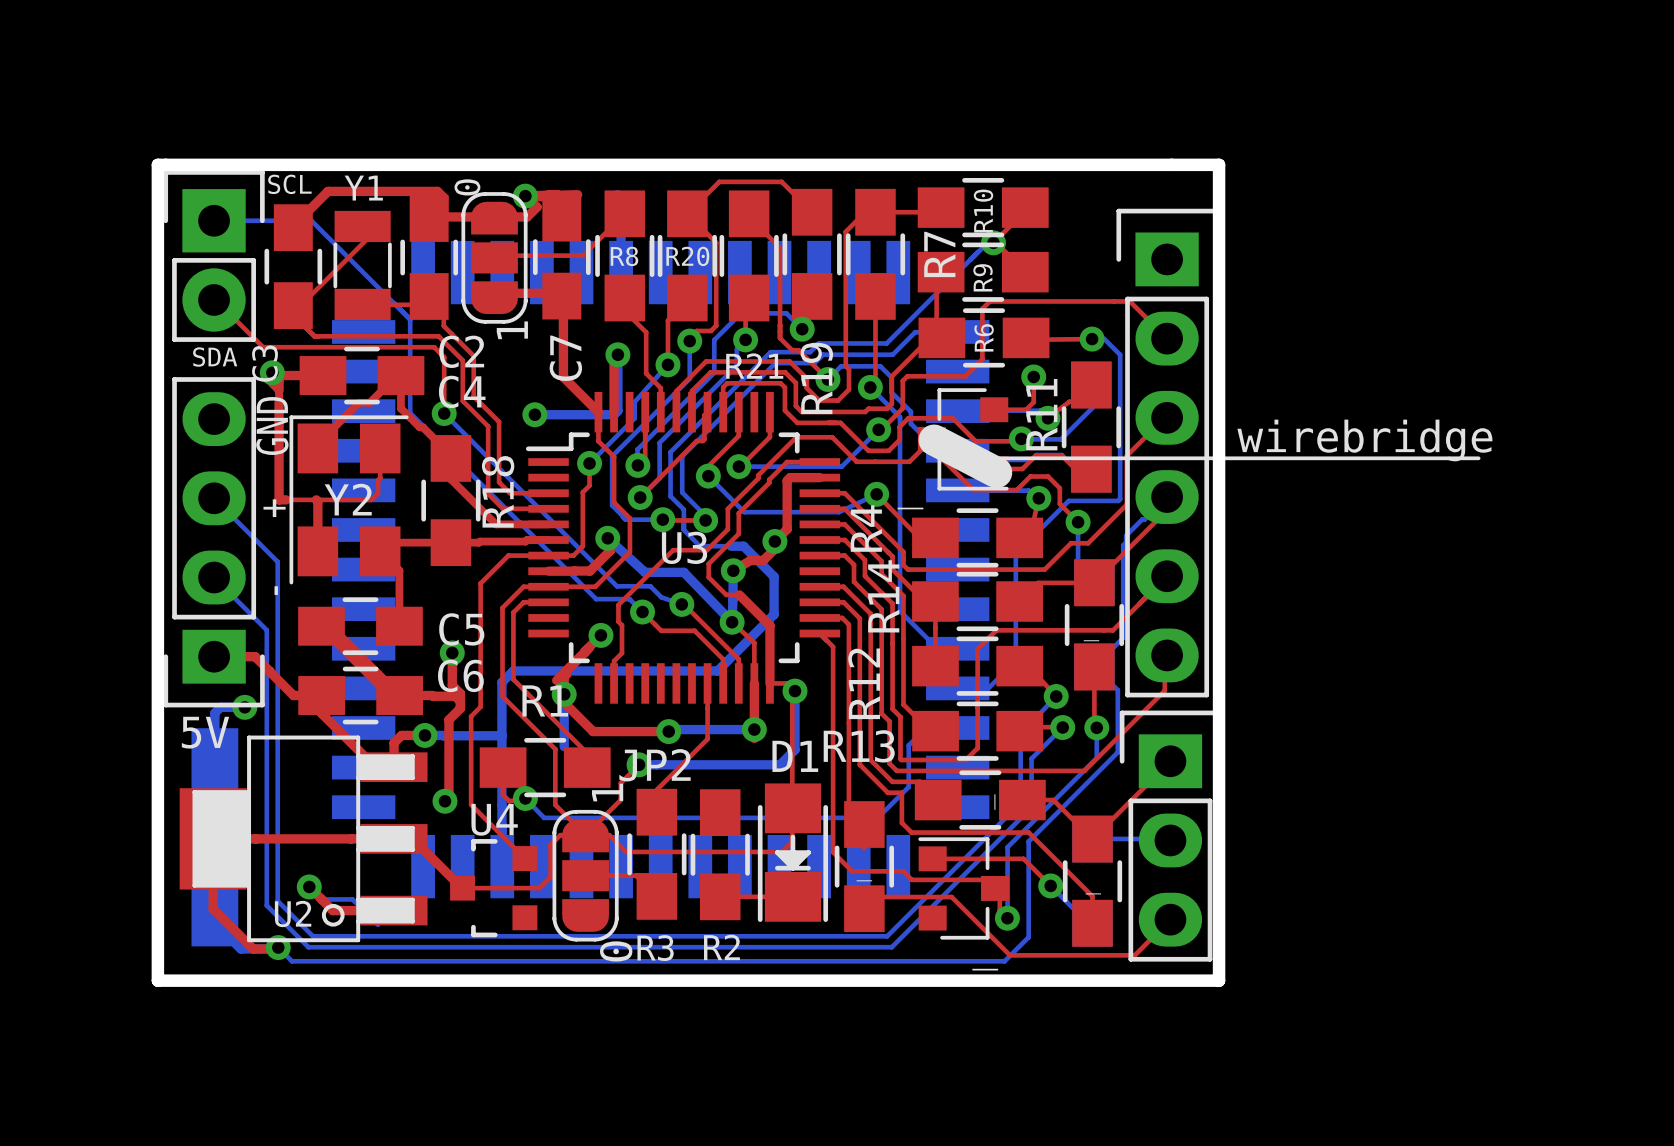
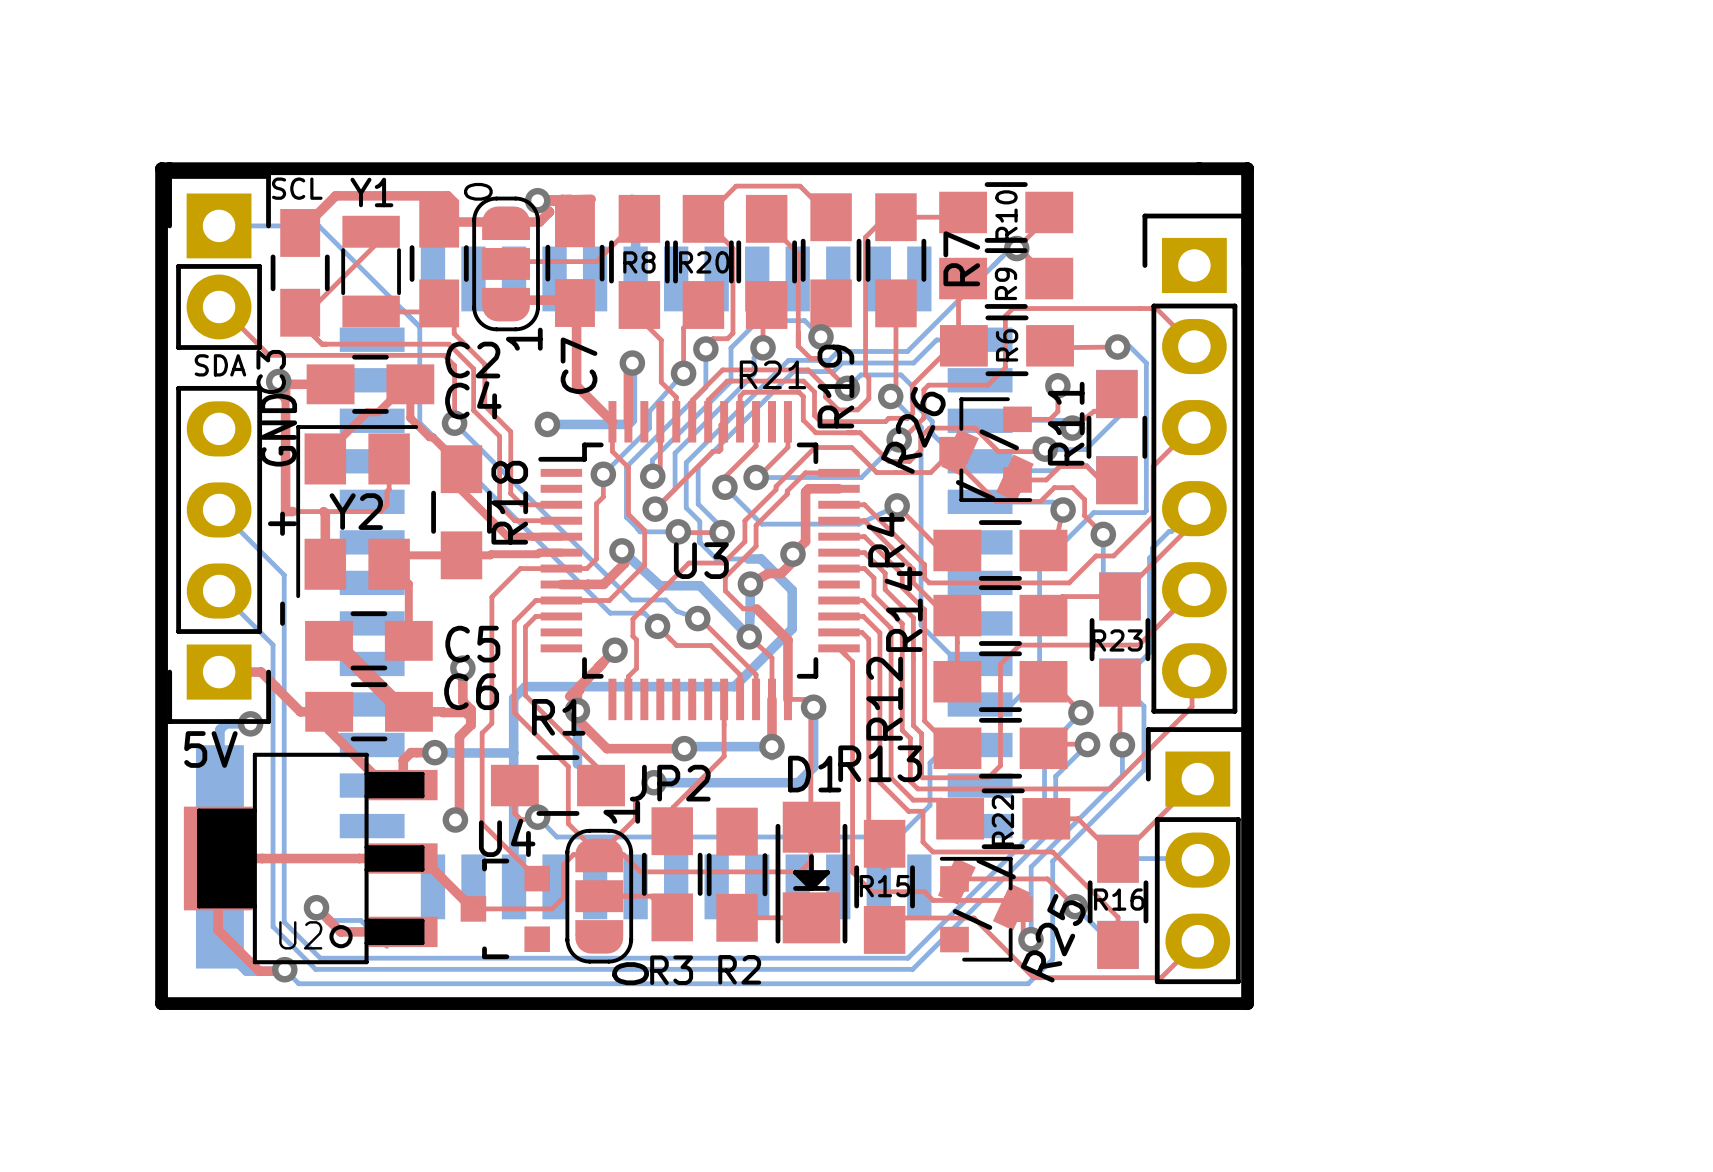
line: (934, 440) (996, 472) -> none
text: wirebridge (1364, 440) -> none
R26: none -> (987, 465)
line: (999, 458) (1478, 458) -> none
part name: _ (910, 508) -> none
R23 name: _ (1091, 640) -> R23 (1117, 640)
R22 name: _ (994, 802) -> R22 (1002, 820)
R25: none -> (984, 894)
R15 name: _ (864, 880) -> R15 (885, 886)
R16 name: _ (1093, 893) -> R16 (1119, 899)
part name: _ (985, 969) -> none

